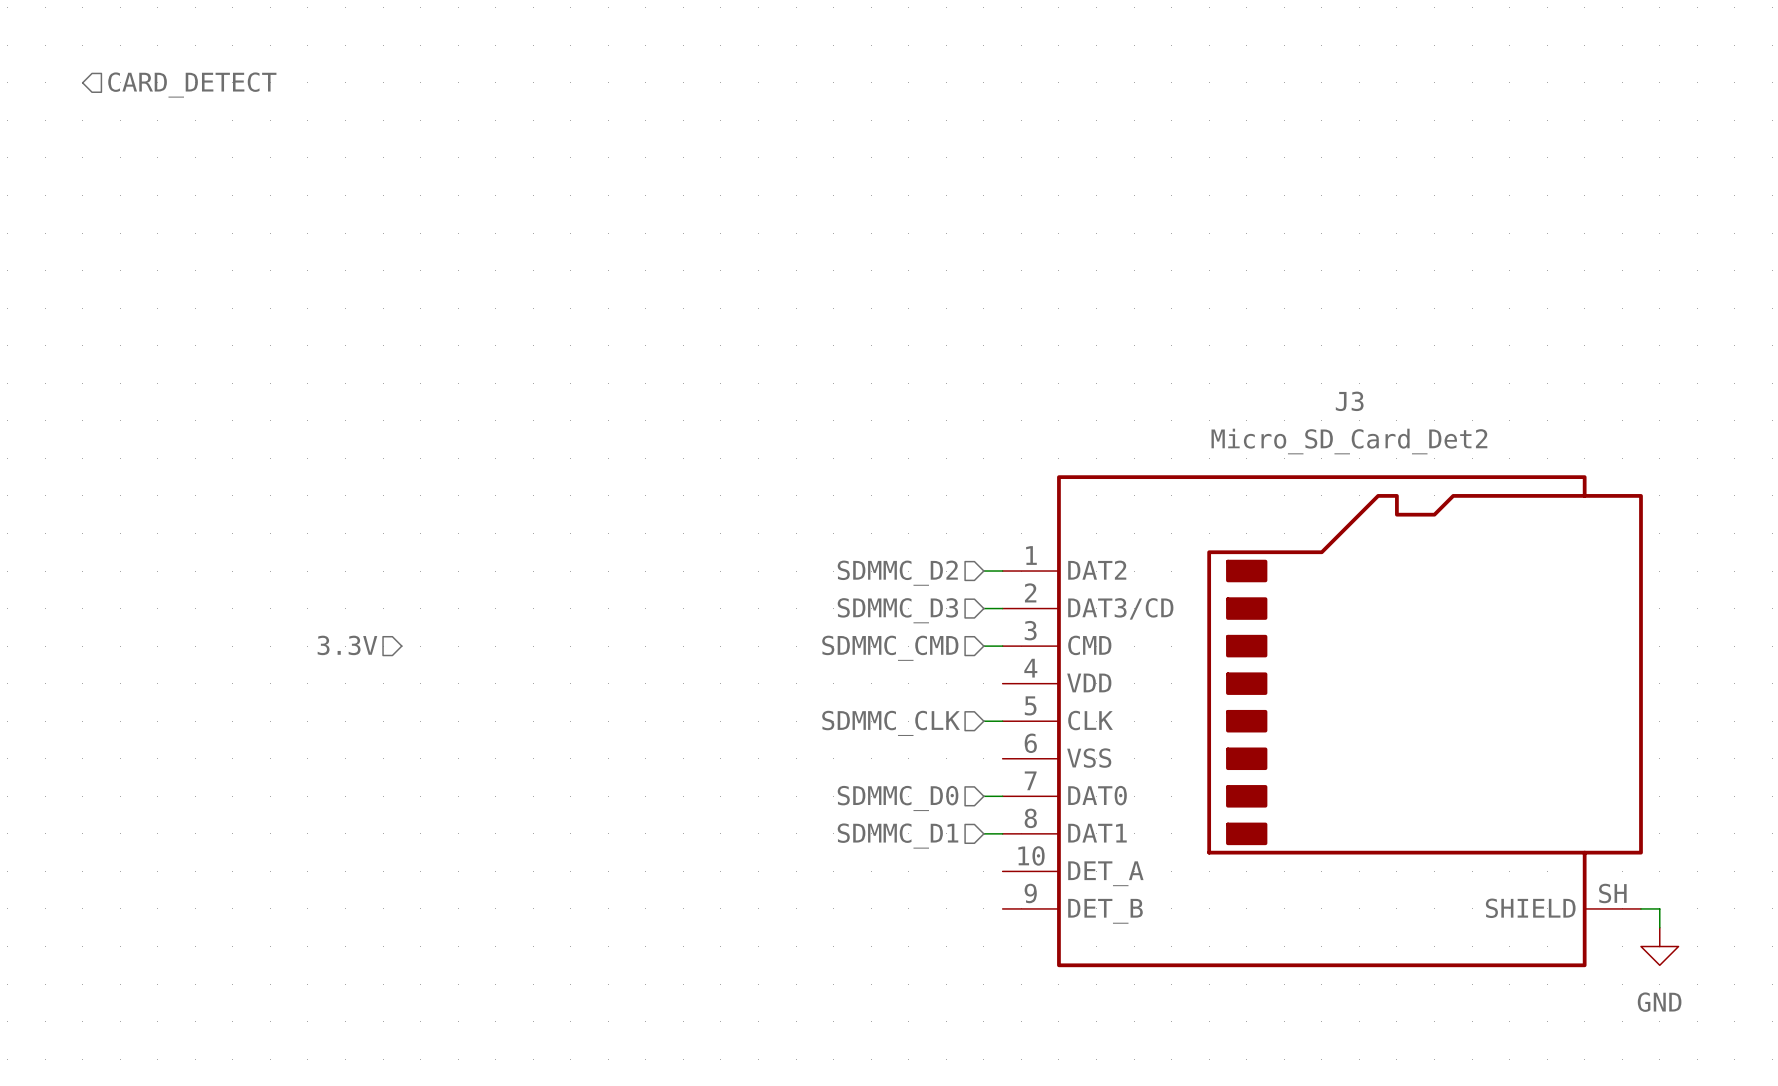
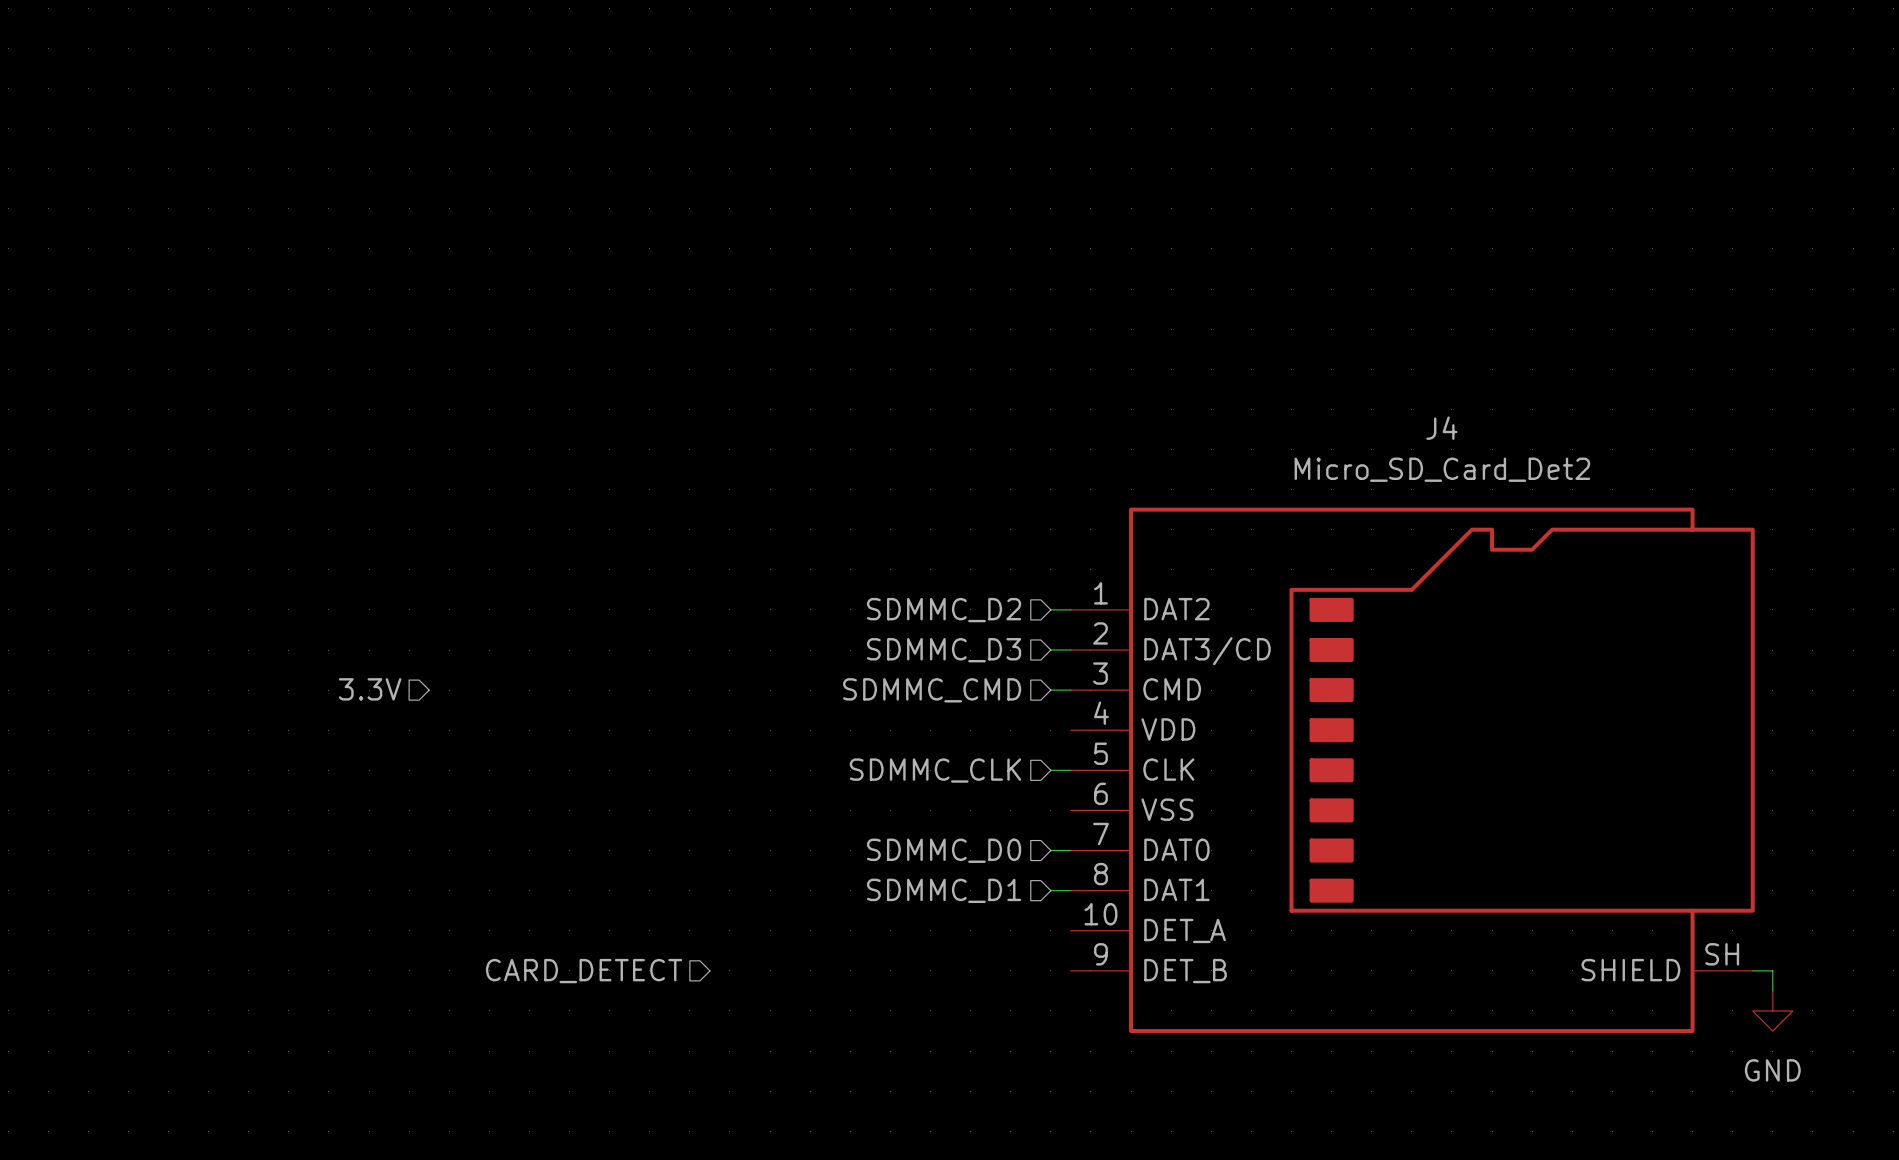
hierarchical label: CARD_DETECT (192, 85) -> none
J3 name: J3 (1349, 401) -> J4 (1441, 428)
hierarchical label: none -> CARD_DETECT (584, 971)

